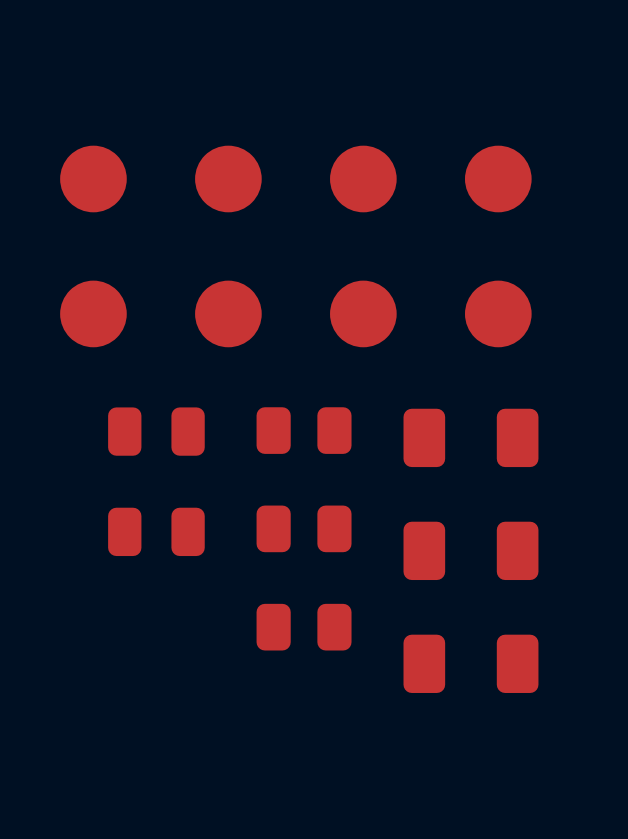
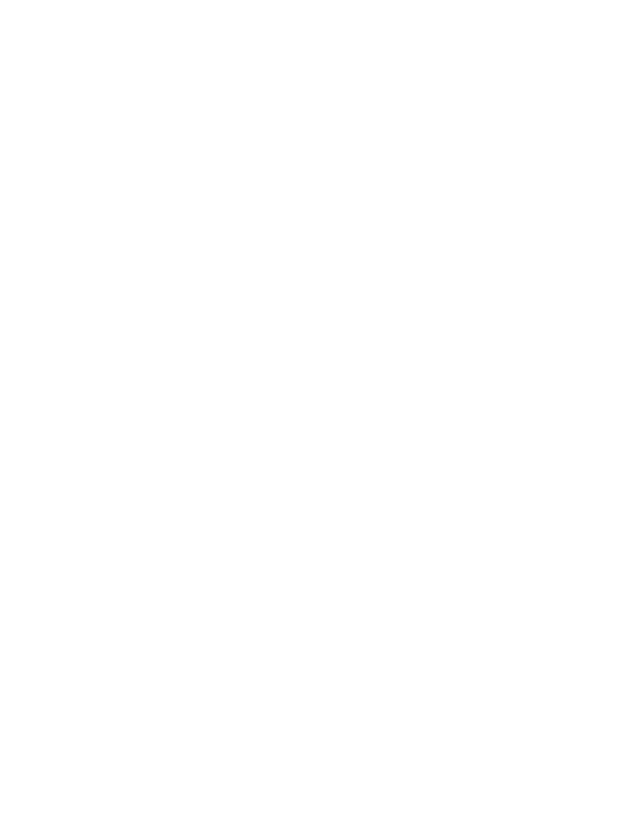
part: (93, 179) -> none
part: (228, 179) -> none
part: (363, 179) -> none
part: (498, 179) -> none
part: (93, 313) -> none
part: (228, 313) -> none
part: (363, 313) -> none
part: (498, 313) -> none
part: (304, 430) -> none
part: (156, 431) -> none
part: (470, 437) -> none
part: (304, 528) -> none
part: (156, 531) -> none
part: (470, 550) -> none
part: (304, 627) -> none
part: (470, 663) -> none

